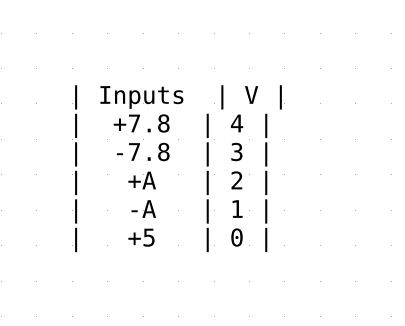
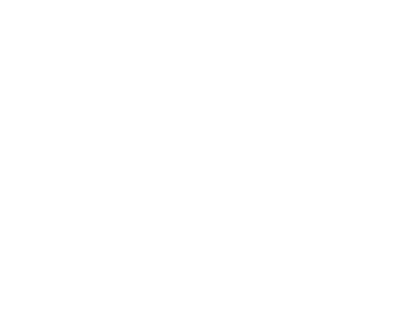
text: | Inputs | V | (178, 97) -> none
text: | +7.8 | 4 | (171, 125) -> none
text: | -7.8 | 3 | (171, 154) -> none
text: | +A | 2 | (171, 182) -> none
text: | -A | 1 | (171, 211) -> none
text: | +5 | 0 | (171, 239) -> none

